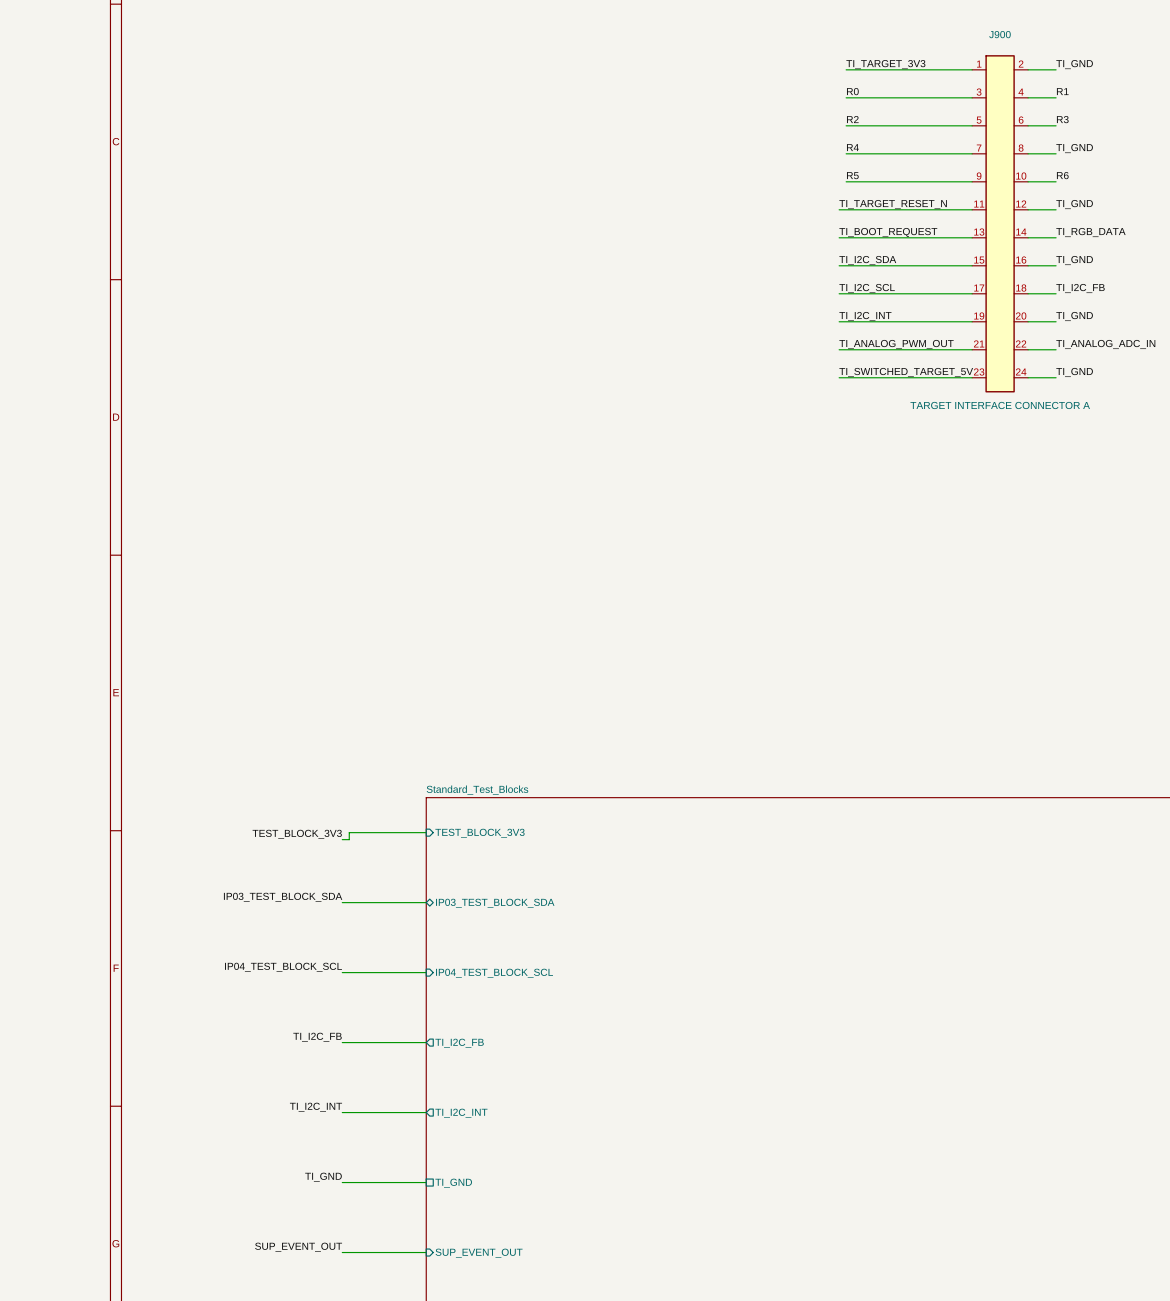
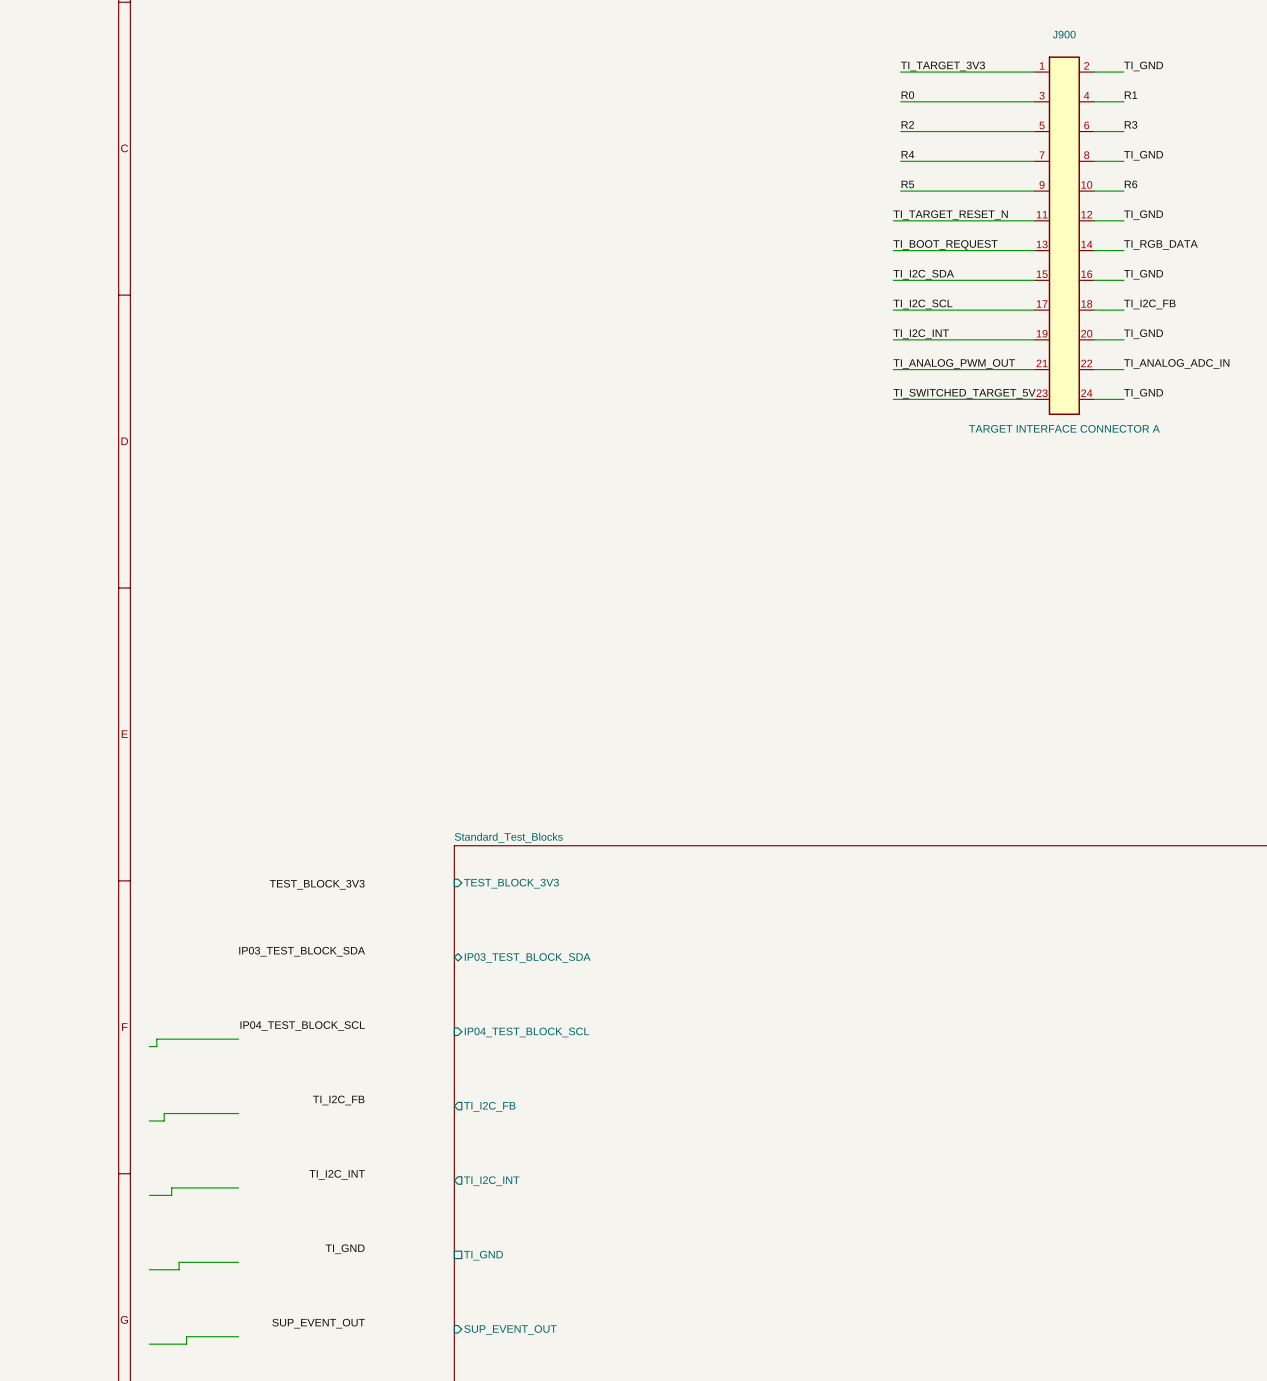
wire: (426, 832) (349, 832) (349, 839) (342, 839) -> none
wire: (342, 902) (426, 902) -> none
wire: (342, 972) (426, 972) -> none
wire: none -> (238, 1039) (156, 1039) (156, 1046) (149, 1046)
wire: (342, 1042) (426, 1042) -> none
wire: none -> (238, 1113) (164, 1113) (164, 1120) (149, 1120)
wire: (342, 1112) (426, 1112) -> none
wire: none -> (238, 1187) (171, 1187) (171, 1195) (149, 1195)
wire: (342, 1182) (426, 1182) -> none
wire: none -> (238, 1262) (179, 1262) (179, 1269) (149, 1269)
wire: (342, 1252) (426, 1252) -> none
wire: none -> (238, 1336) (186, 1336) (186, 1344) (149, 1344)

